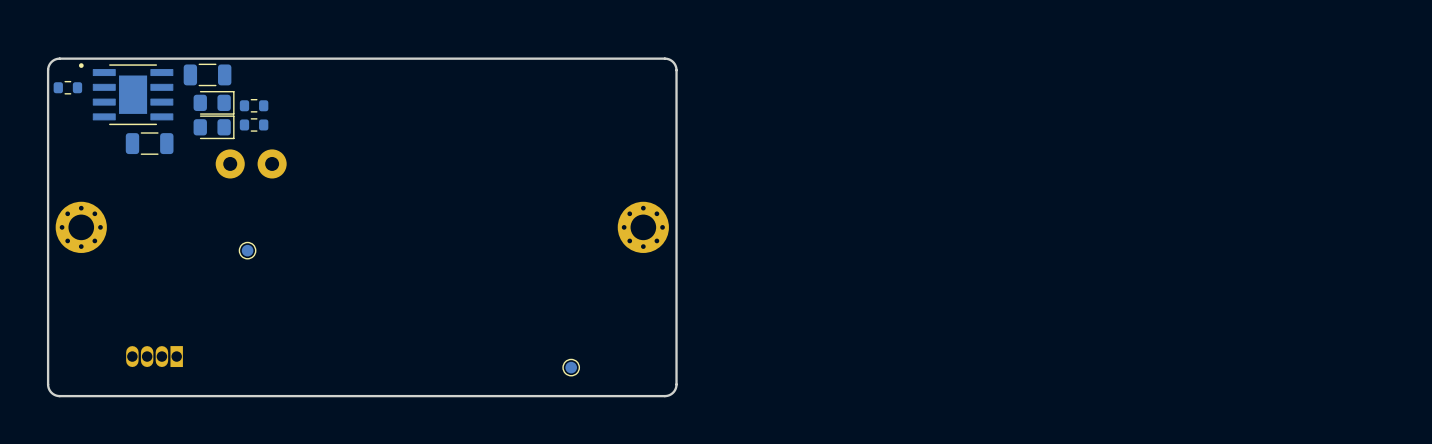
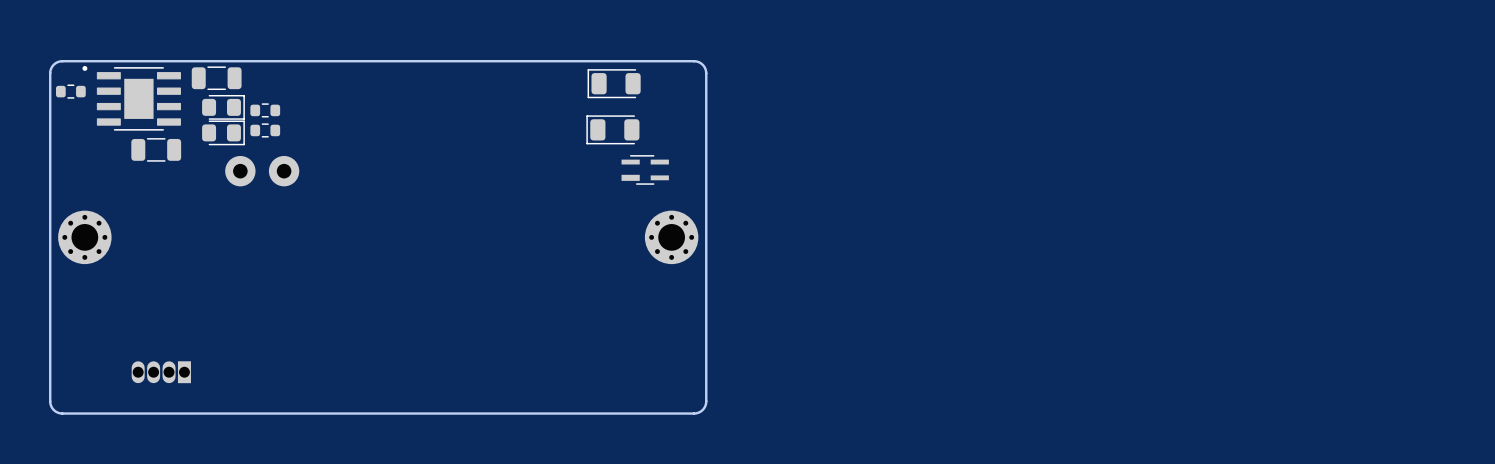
part: none -> (614, 83)
part: none -> (612, 129)
part: none -> (645, 169)
part: (247, 250) -> none
part: (571, 367) -> none

